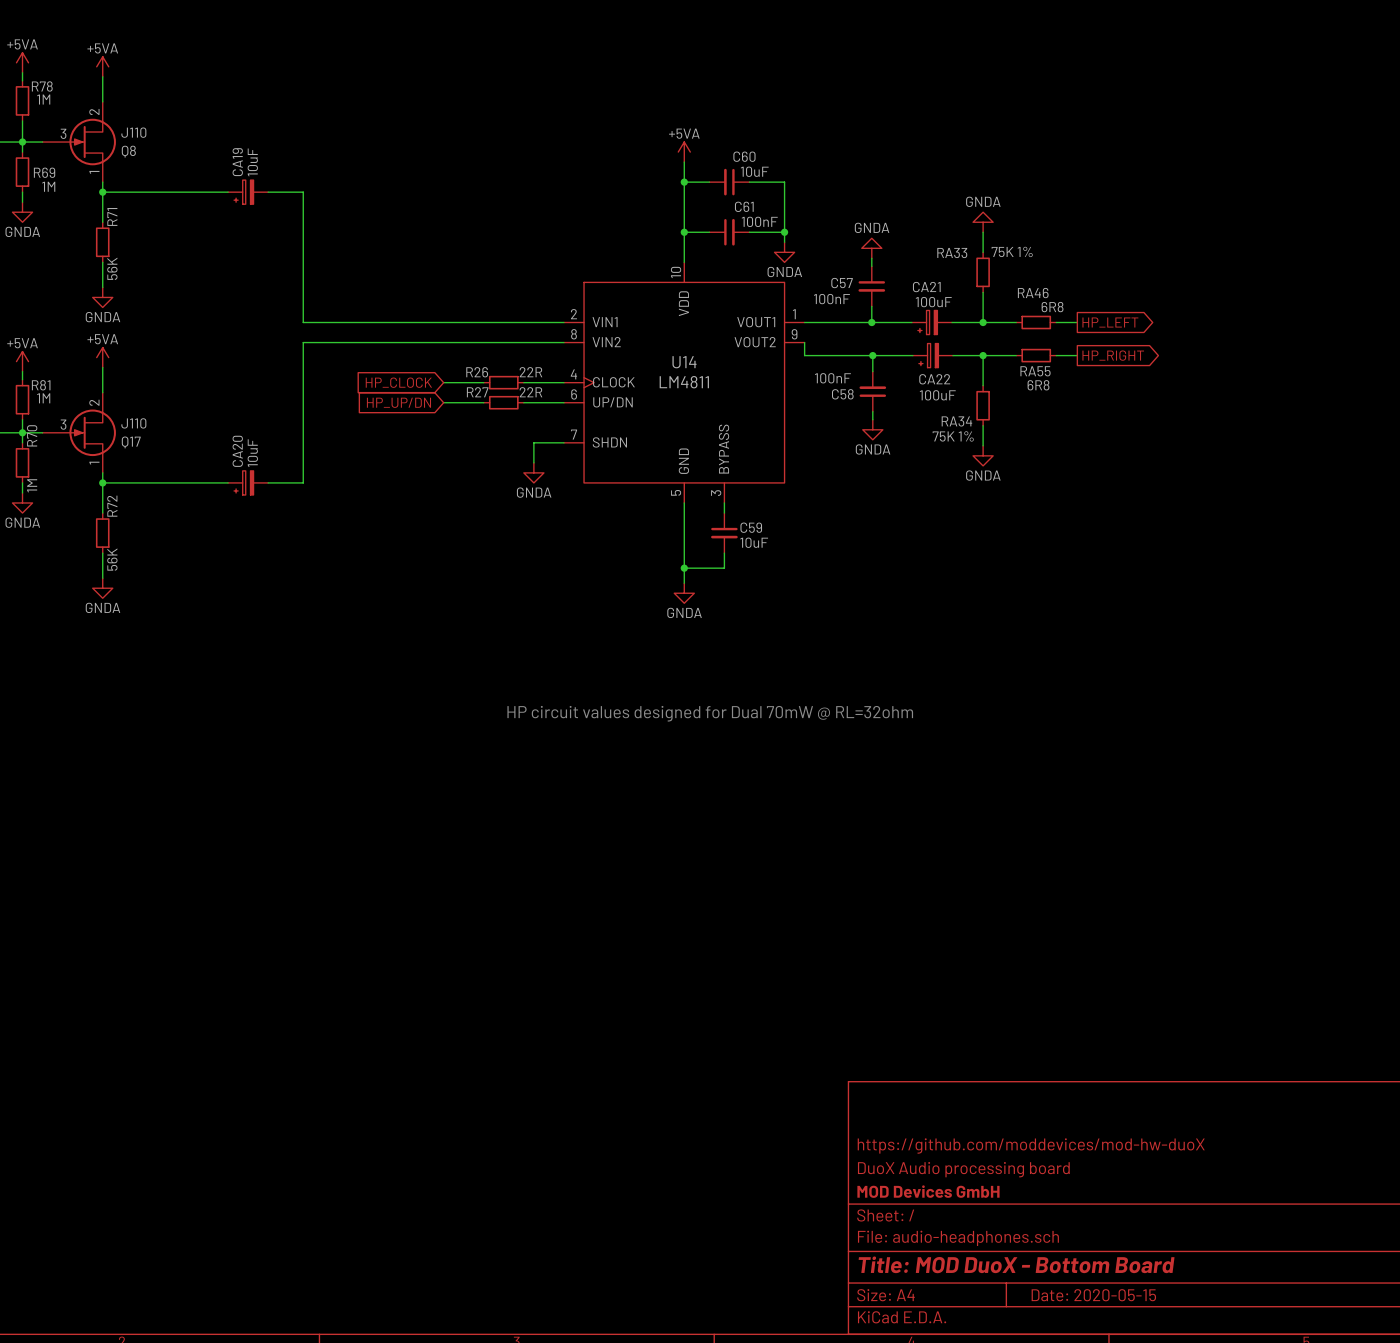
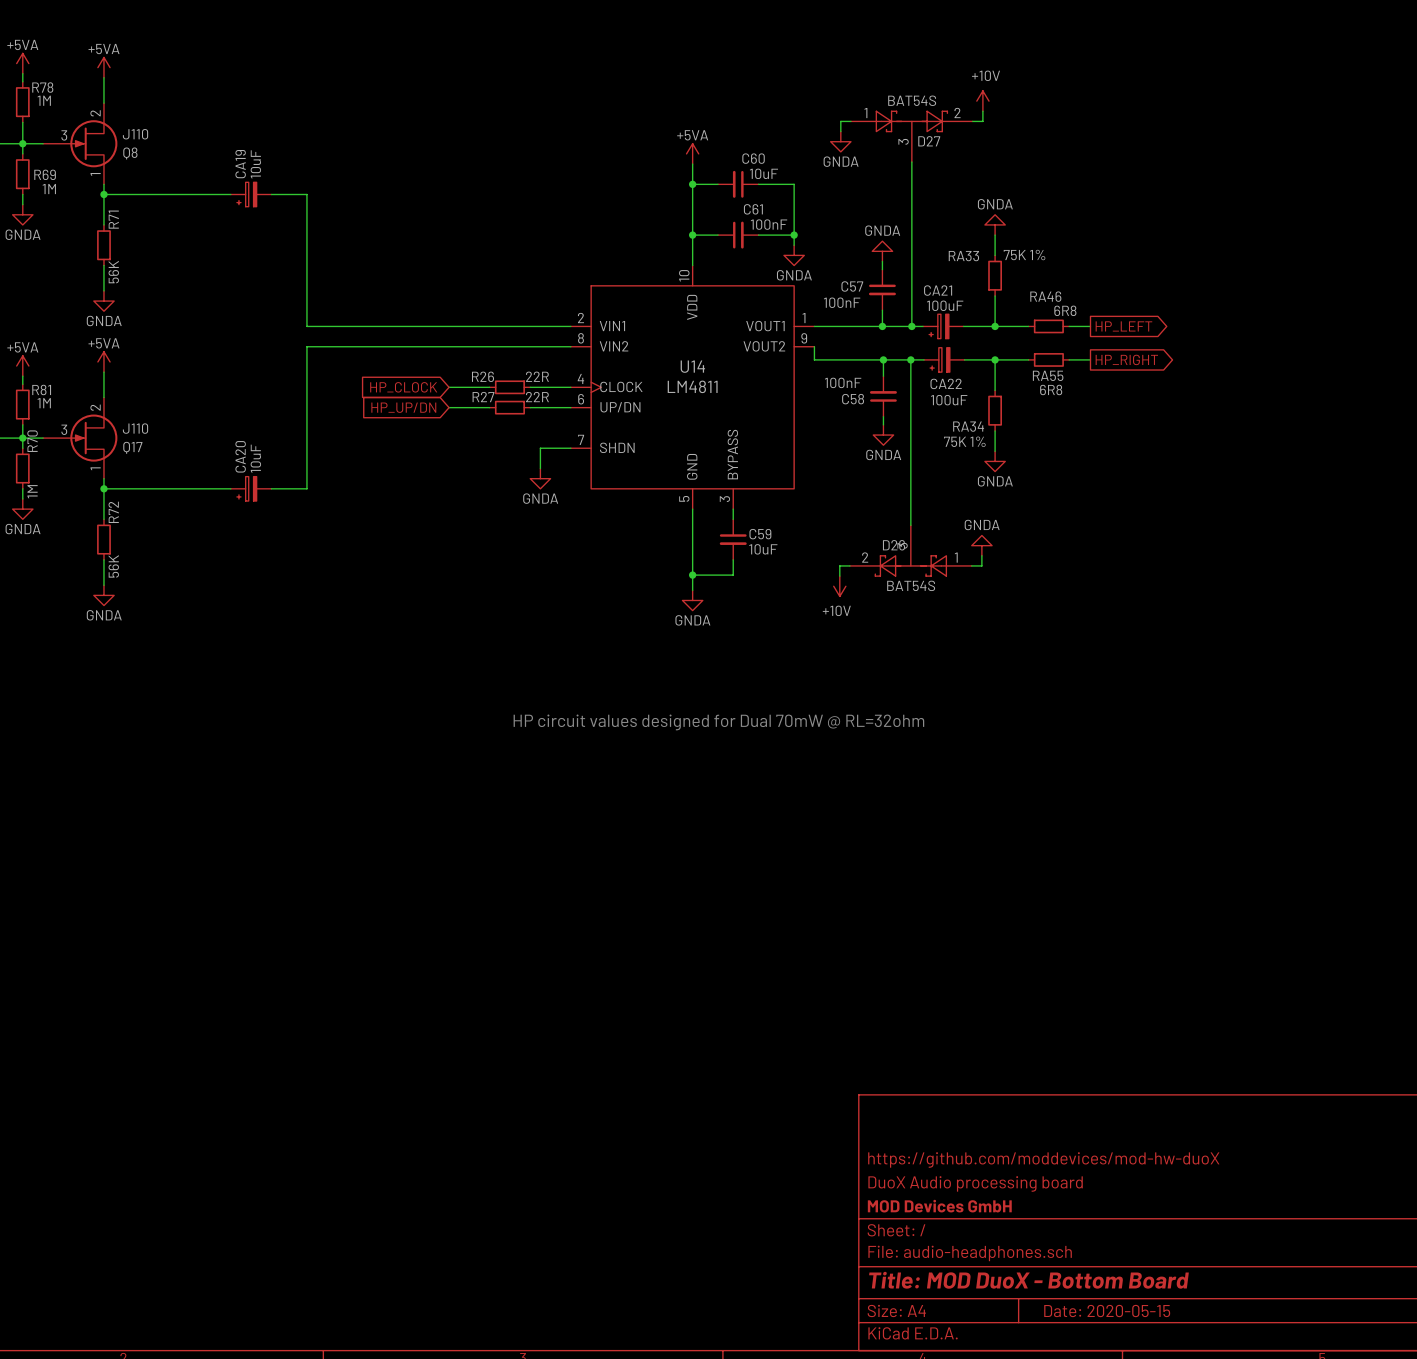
power symbol: none -> +10V (982, 101)
wire: none -> (982, 111) (982, 121) (972, 121)
wire: none -> (850, 121) (840, 121) (840, 131)
D27: none -> BAT54S (911, 136)
power symbol: none -> GNDA (840, 141)
wire: none -> (911, 162) (911, 326)
junction: none -> (911, 326)
wire: none -> (910, 359) (910, 525)
junction: none -> (910, 359)
power symbol: none -> GNDA (981, 545)
D26: none -> BAT54S (910, 550)
wire: none -> (981, 555) (981, 565) (971, 565)
wire: none -> (849, 565) (839, 565) (839, 576)
power symbol: none -> +10V (839, 586)

